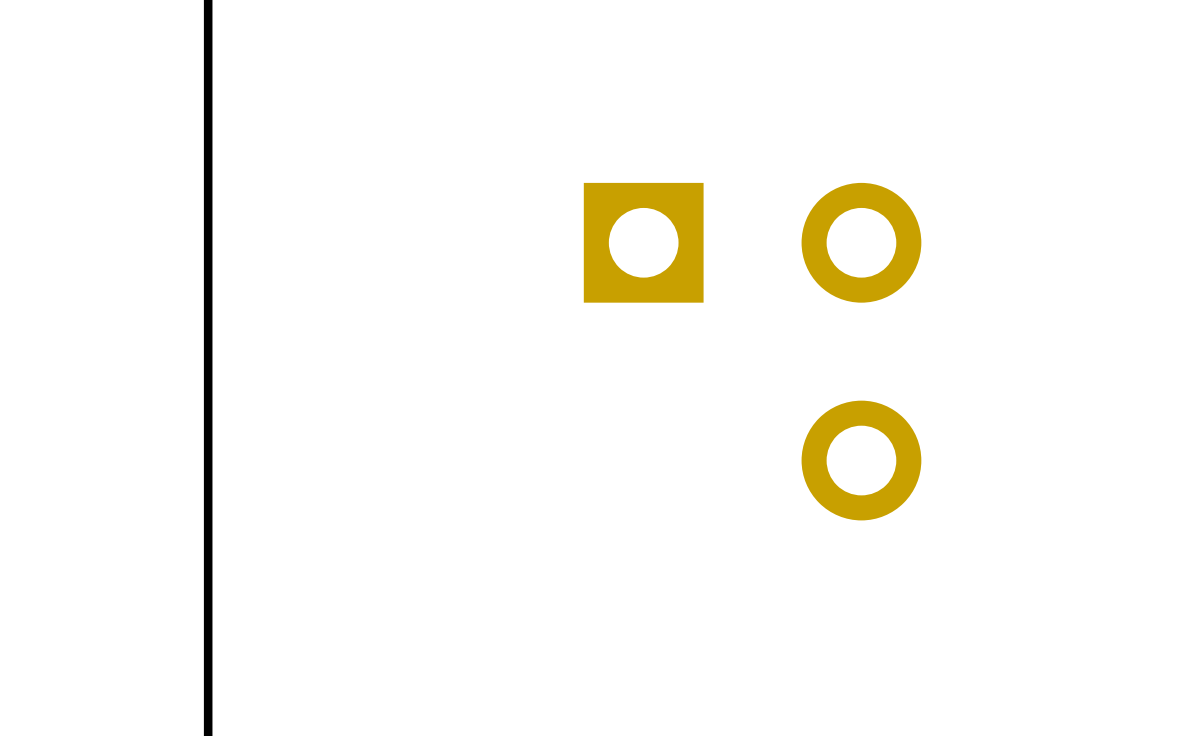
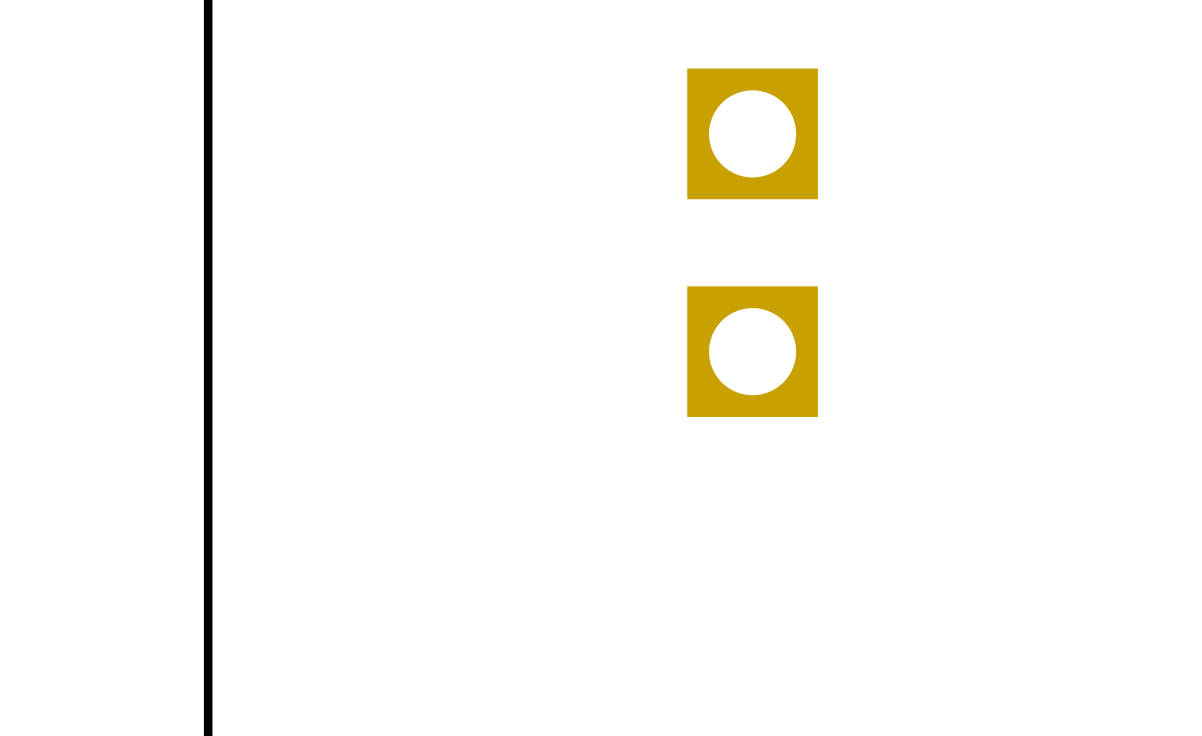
part: none -> (752, 133)
part footprint: [583, 182, 922, 521] -> [687, 286, 818, 417]

